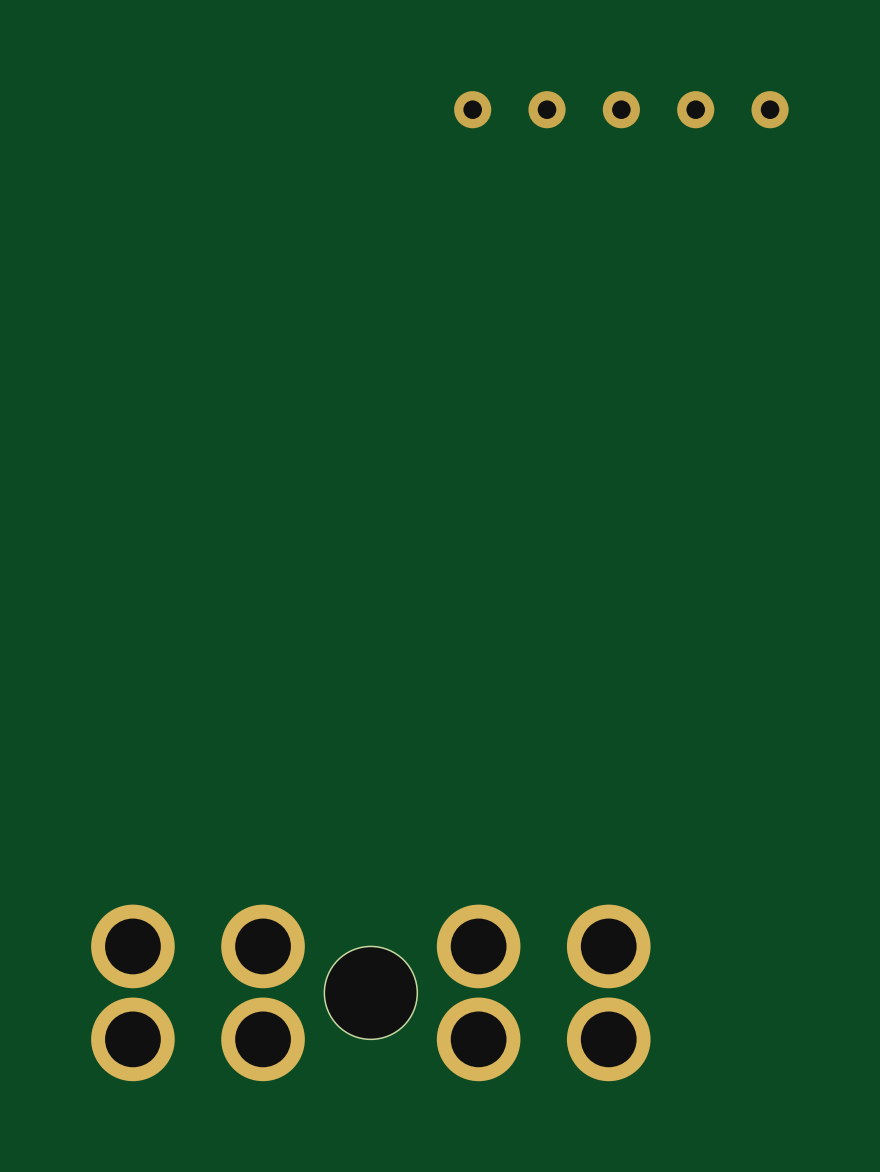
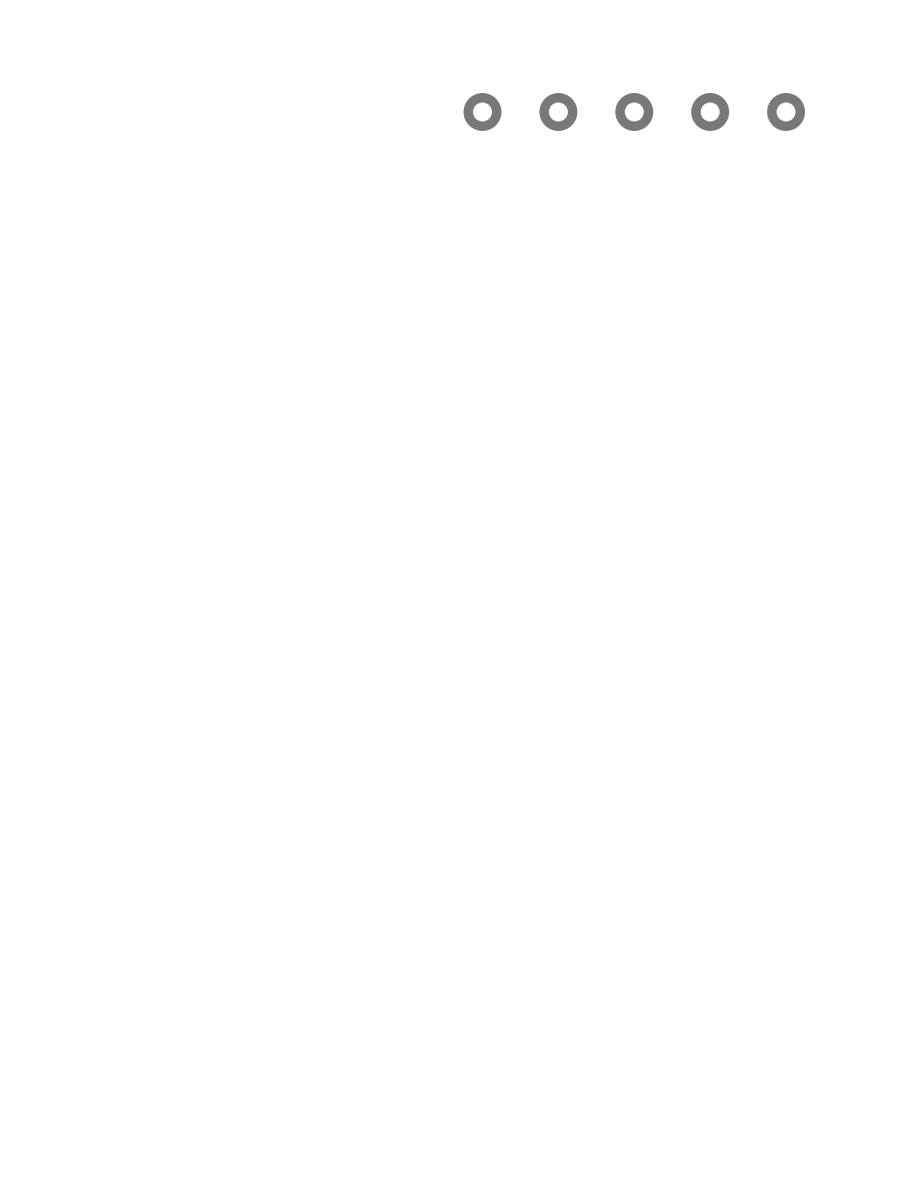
part: (370, 992) -> none

